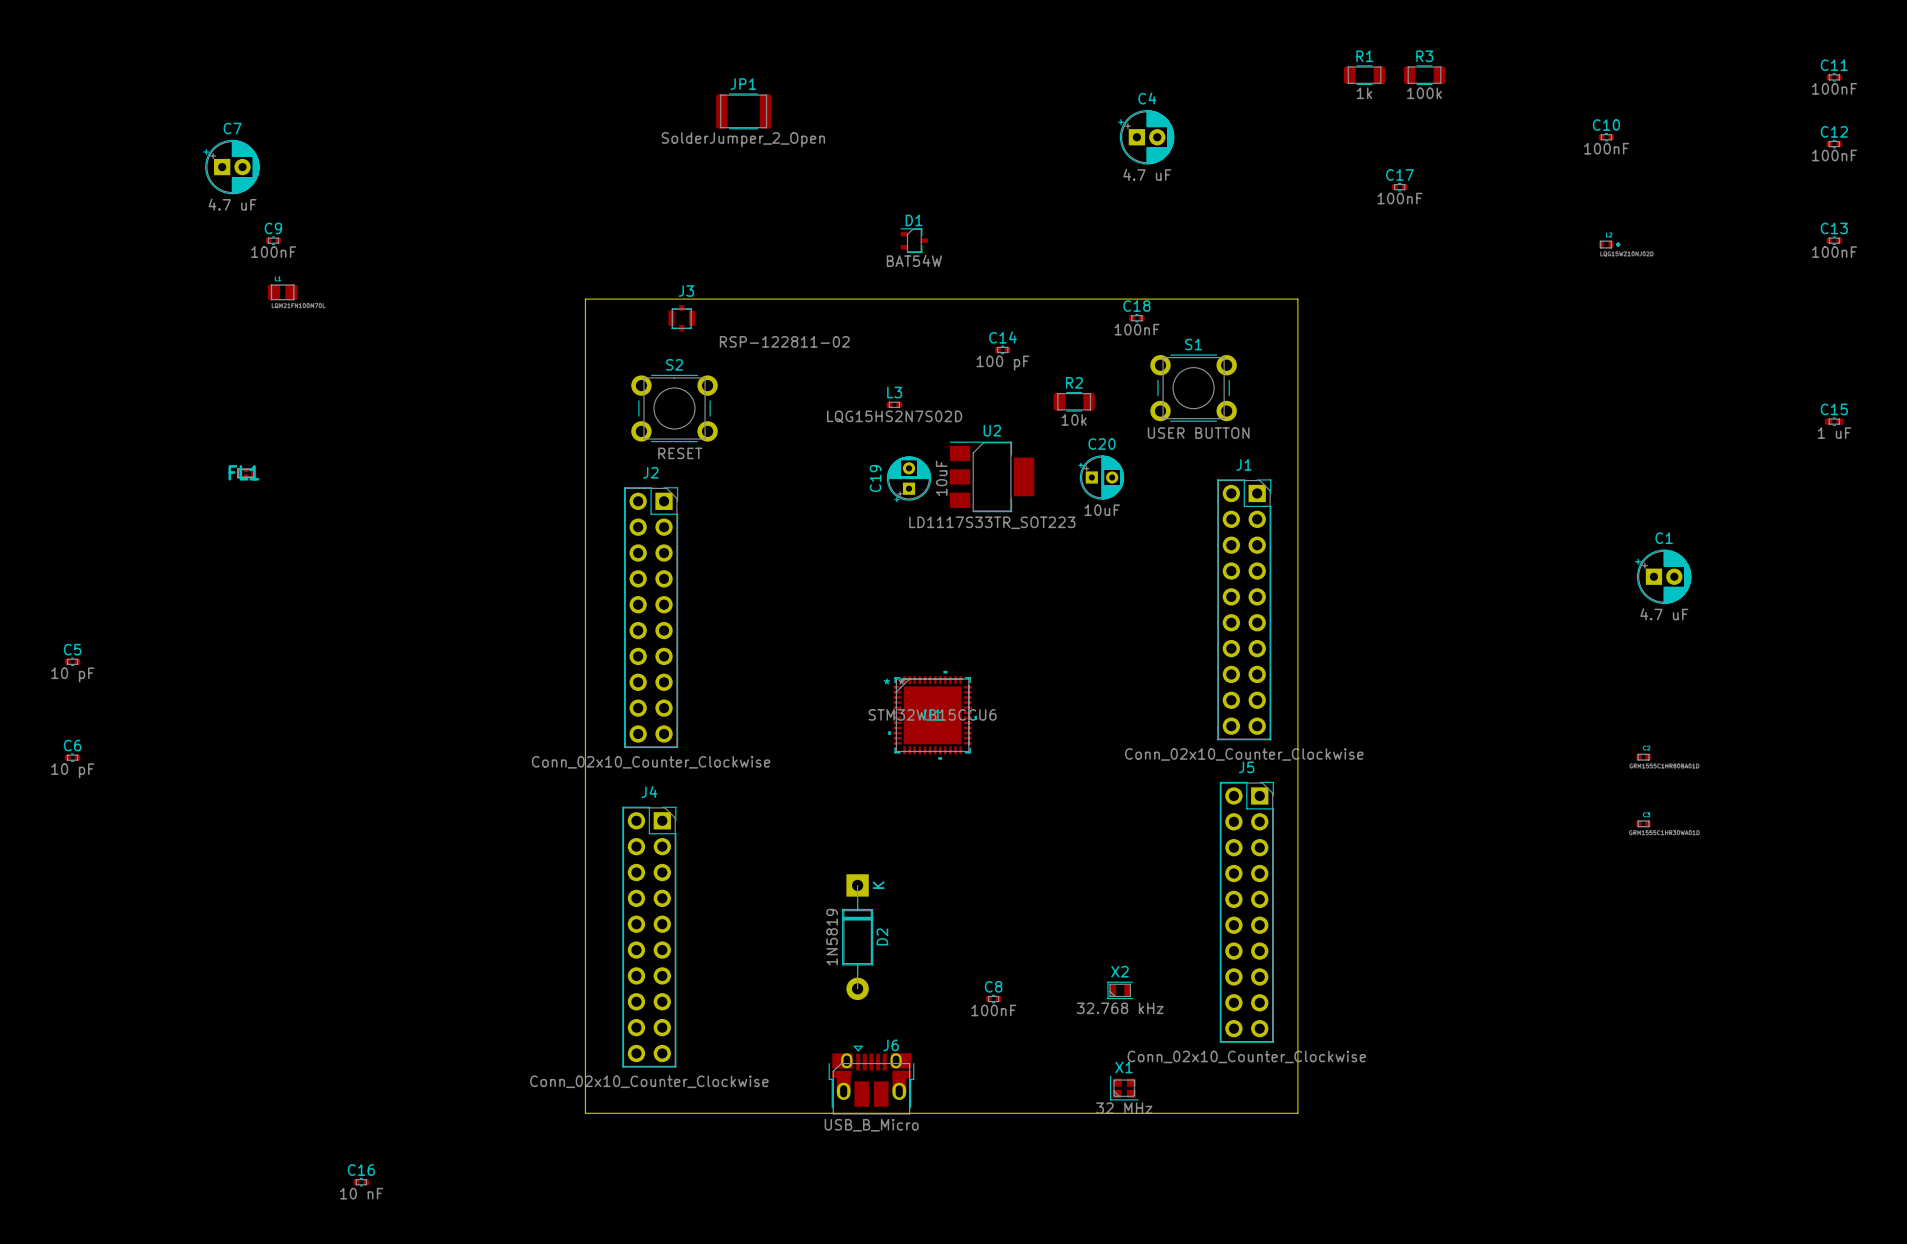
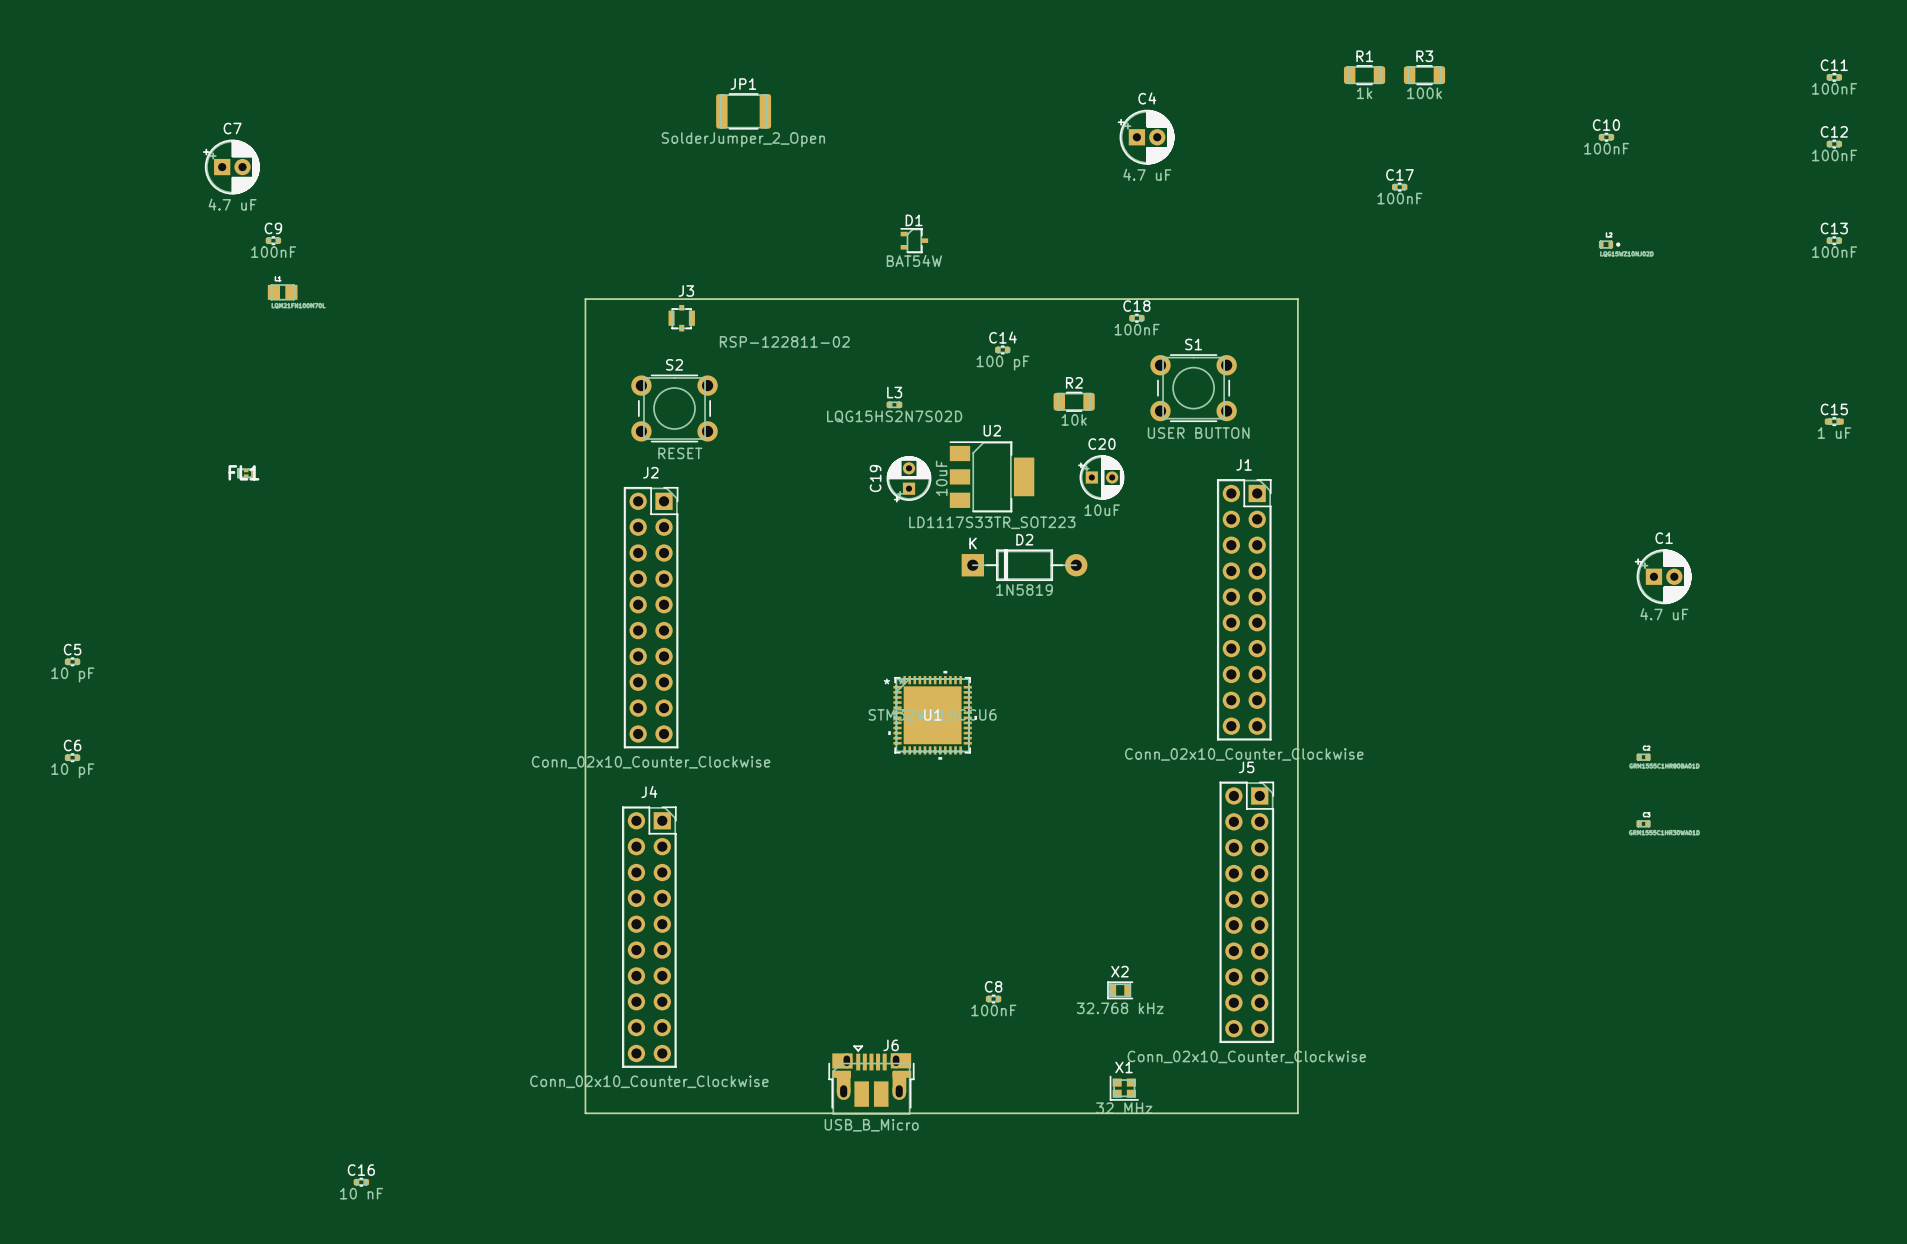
D2 rotation: 0° (857, 937) -> 90° counterclockwise (1024, 565)
D2 position: (857, 937) -> (1024, 565)

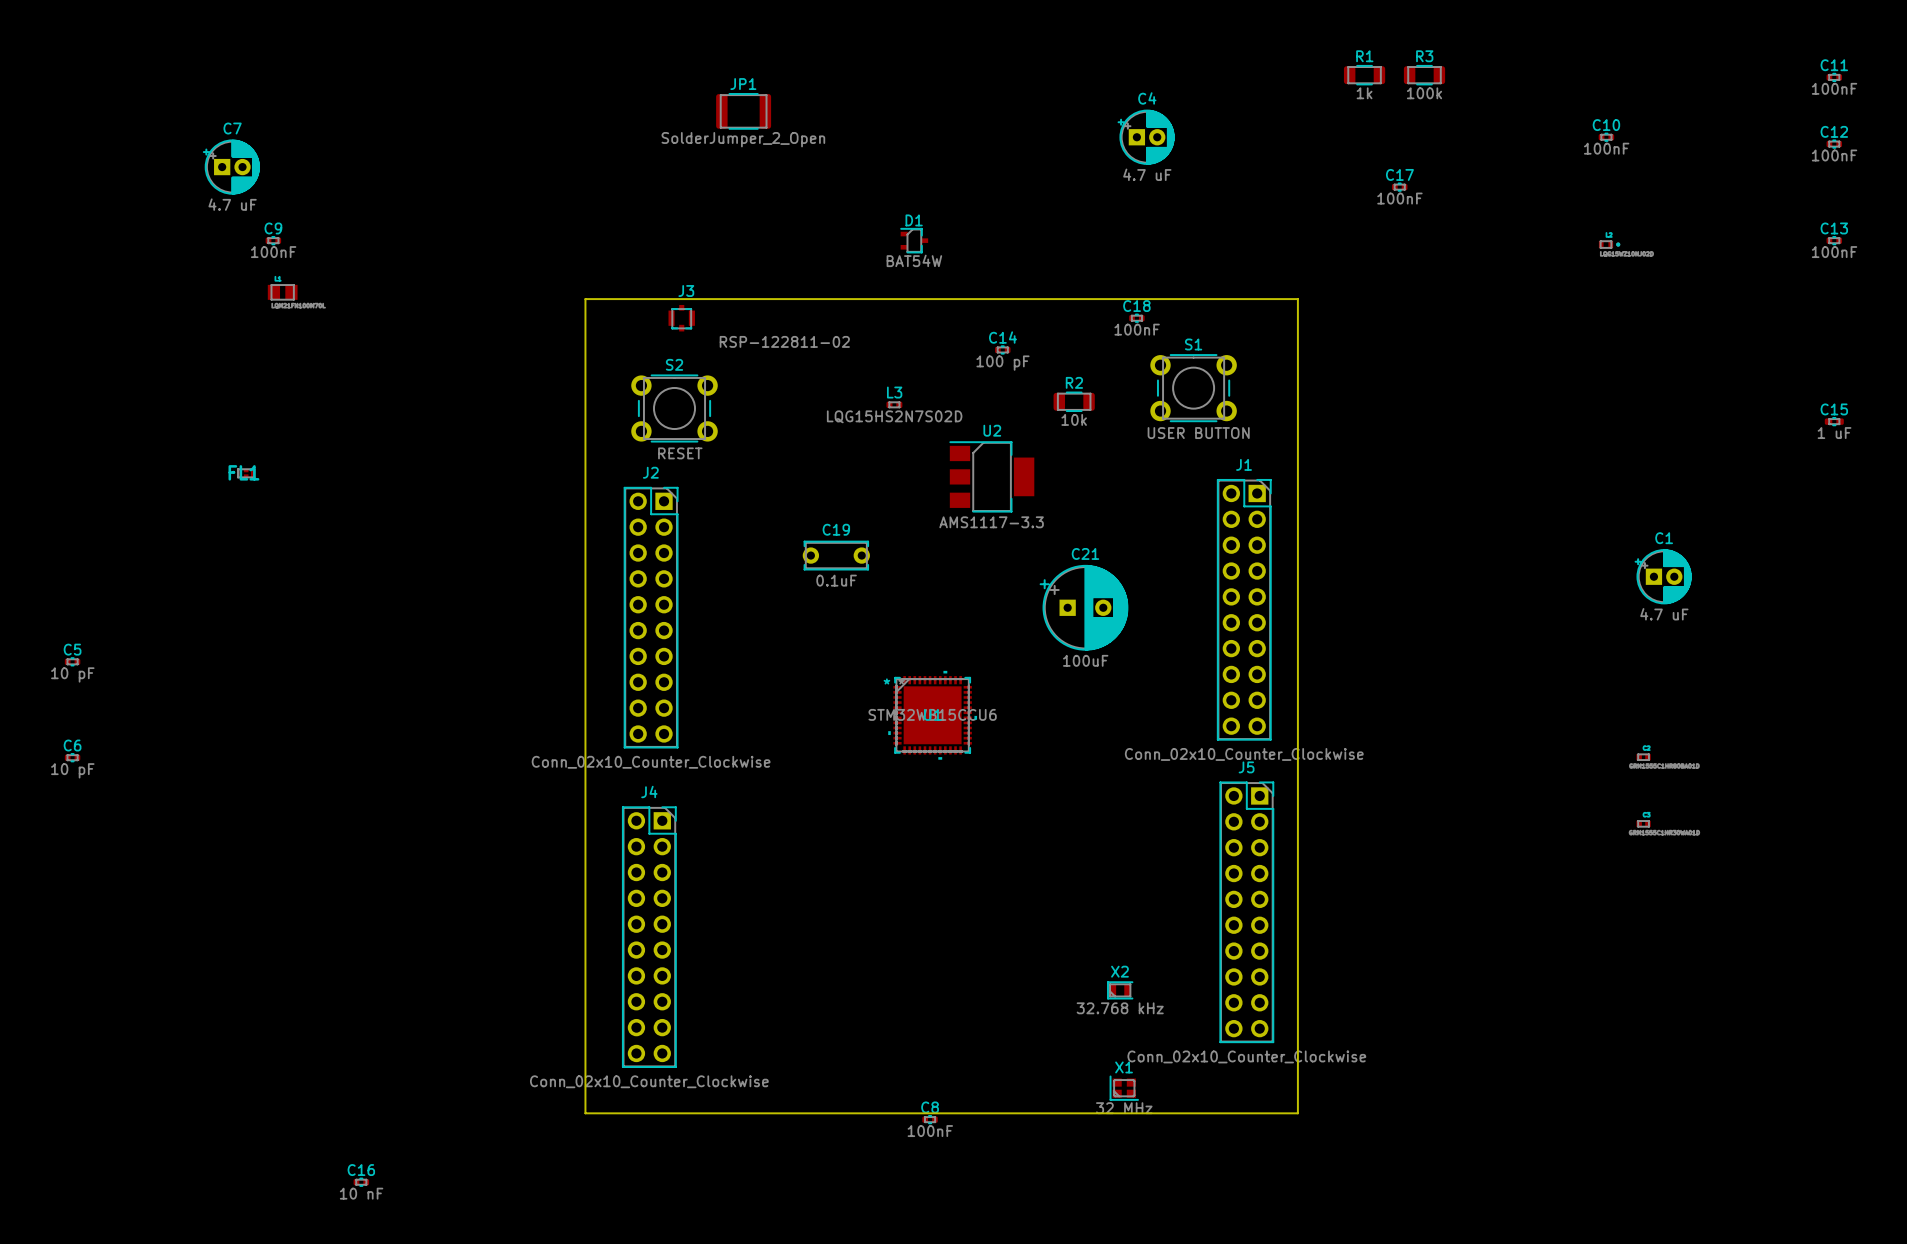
C19 footprint: [886, 456, 932, 503] -> [802, 541, 870, 571]
C20: 10uF (1101, 477) -> none
C19 name position: C19 (875, 478) -> C19 (836, 529)
C19 value: 10uF (941, 478) -> 0.1uF (836, 580)
U2 value: LD1117S33TR_SOT223 (992, 522) -> AMS1117-3.3 (991, 522)
D2: 1N5819 (1024, 565) -> none
C21: none -> 100uF (1084, 607)
C8 position: (993, 999) -> (930, 1119)
J6: USB_B_Micro (871, 1080) -> none

